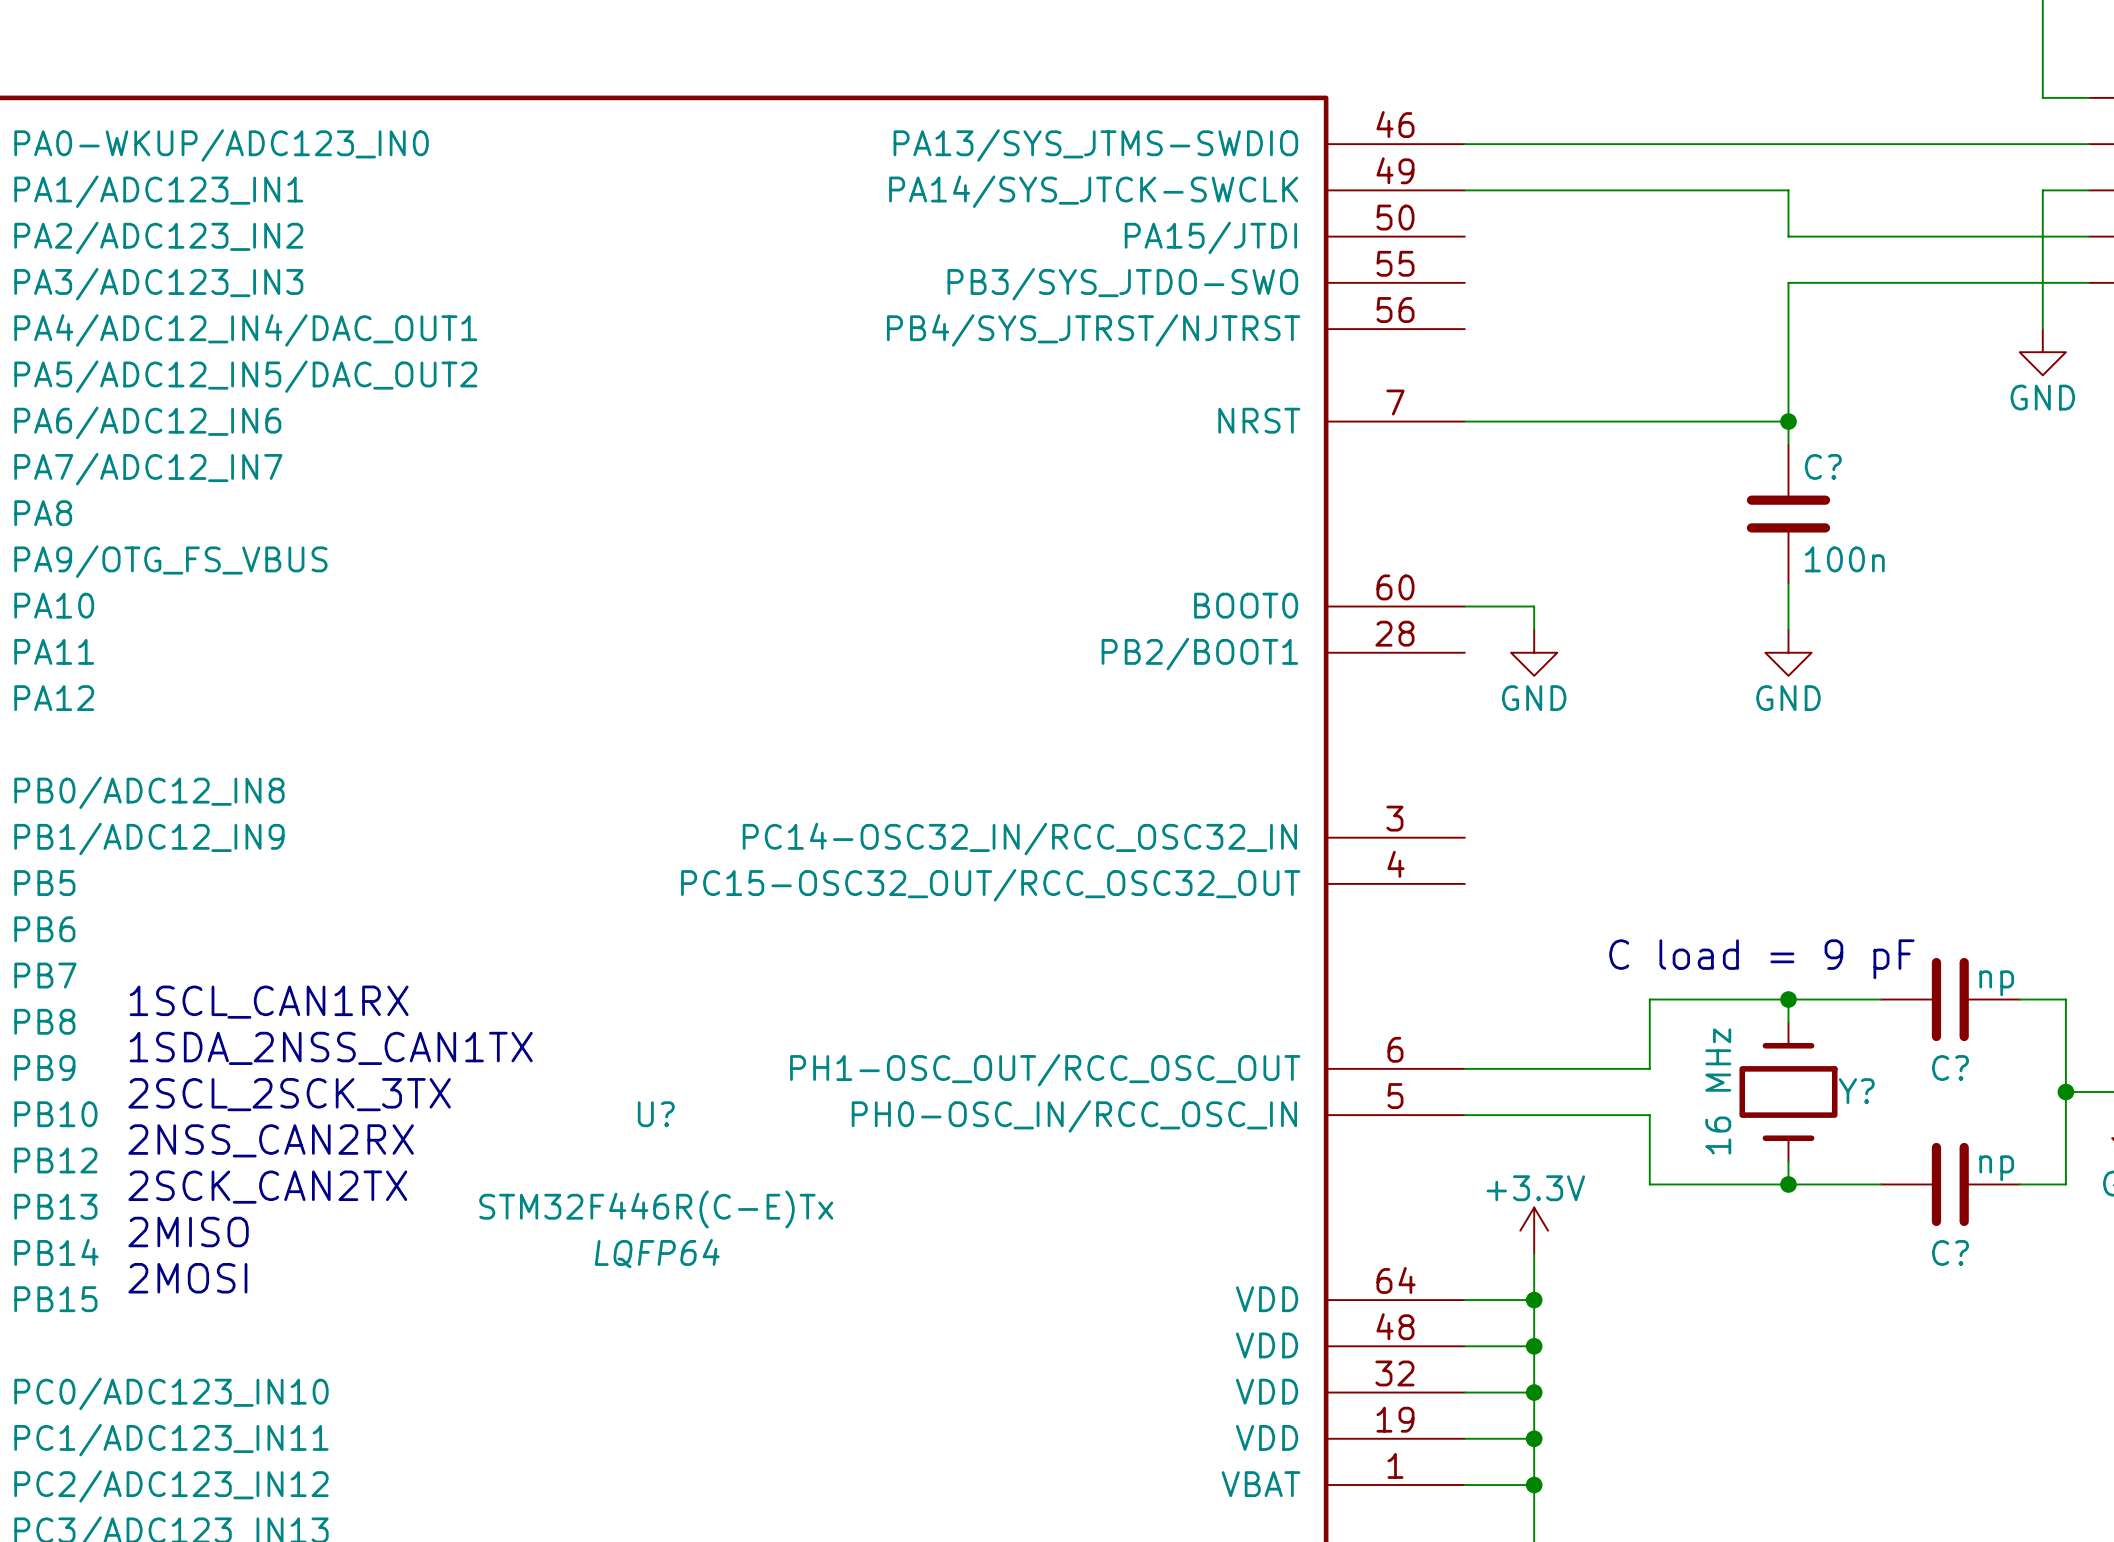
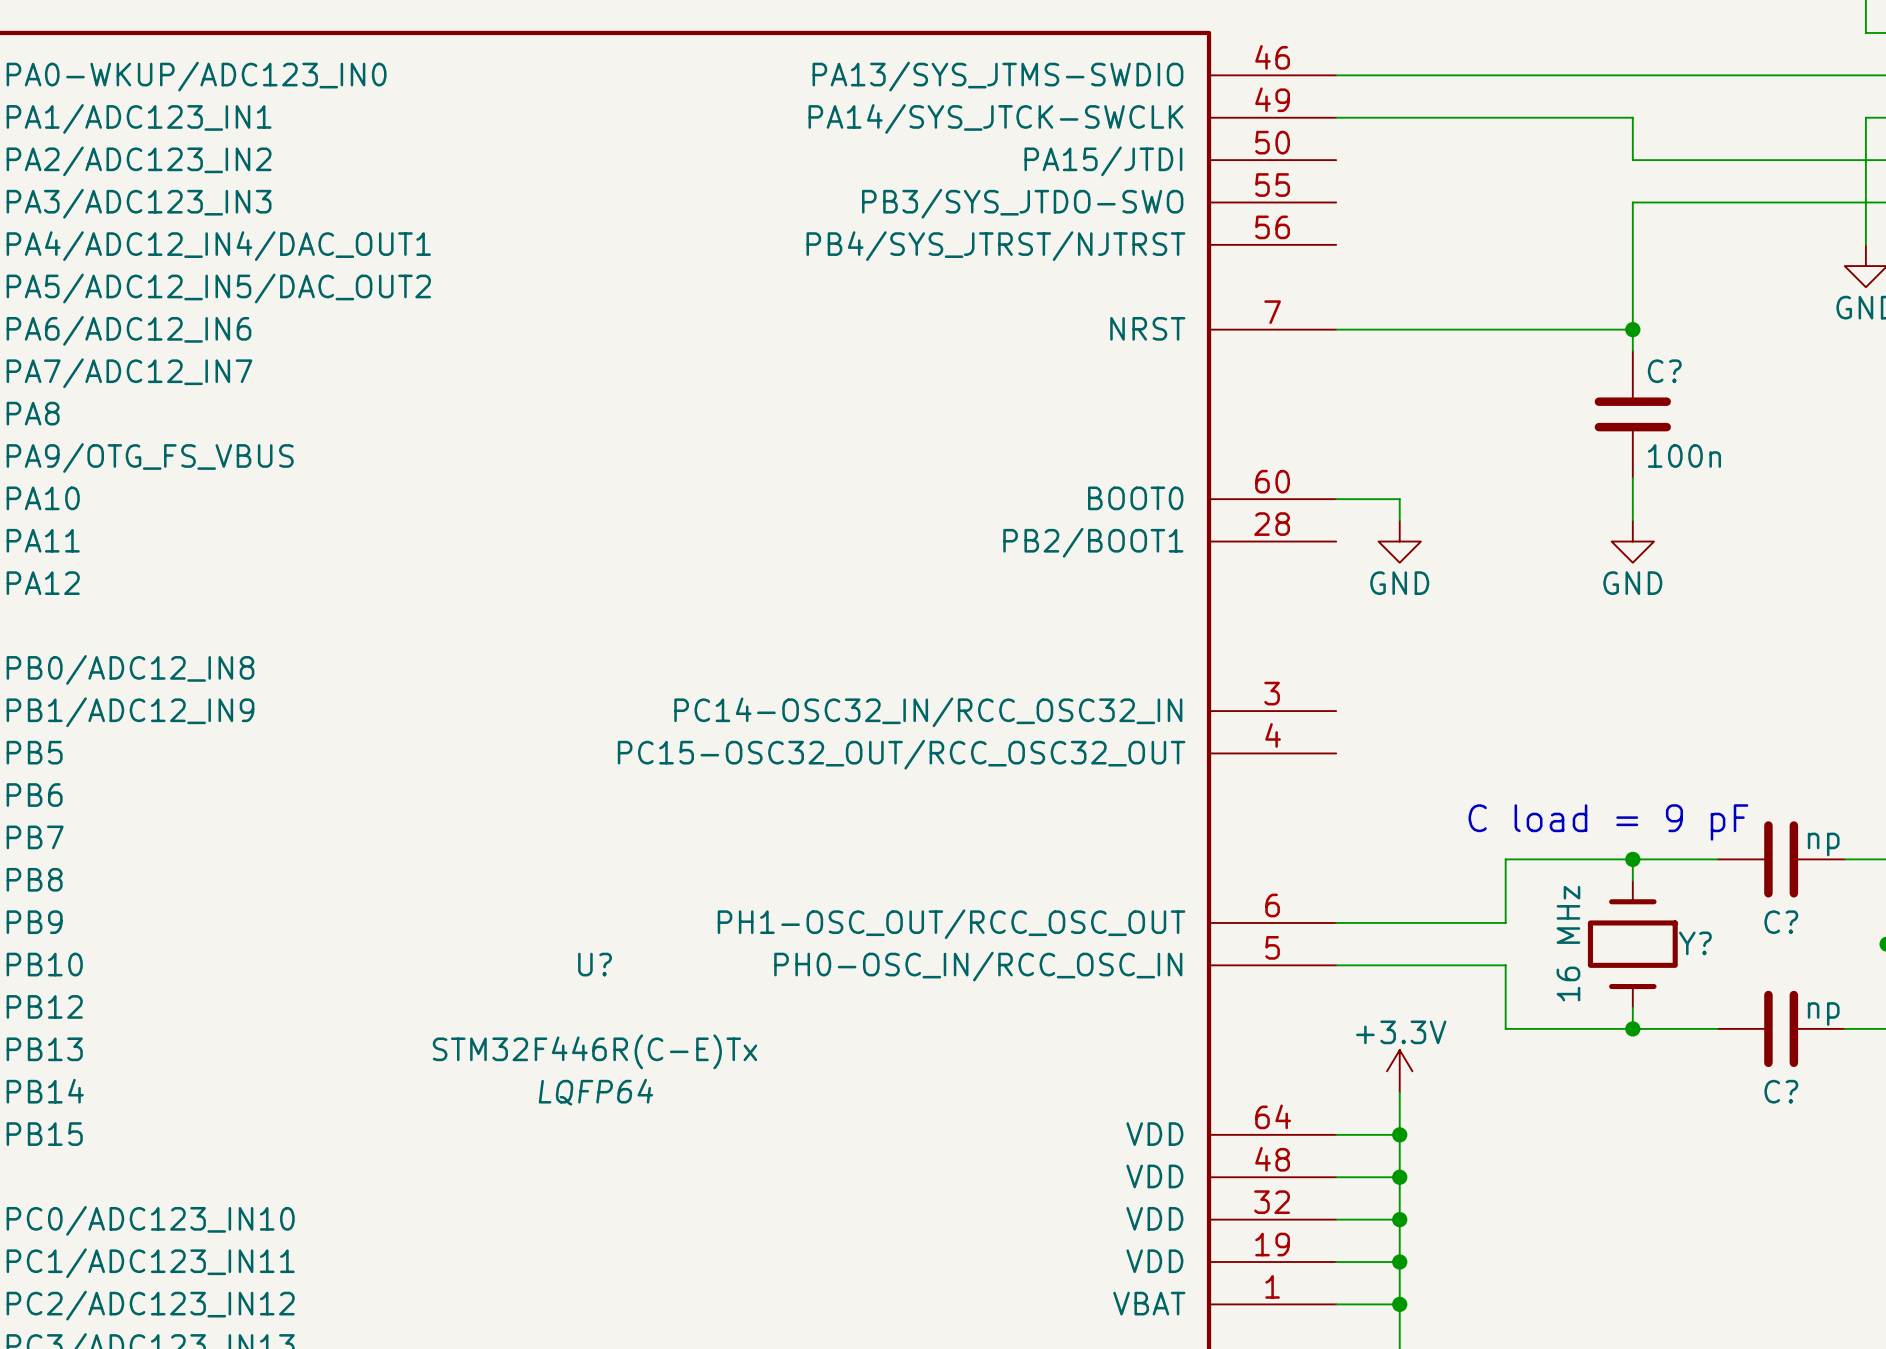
text: 1SCL_CAN1RX (269, 1002) -> none
text: 1SDA_2NSS_CAN1TX (331, 1048) -> none
text: 2SCL_2SCK_3TX (289, 1094) -> none
text: 2NSS_CAN2RX (271, 1140) -> none
text: 2SCK_CAN2TX (267, 1187) -> none
text: 2MISO (188, 1232) -> none
text: 2MOSI (187, 1278) -> none

